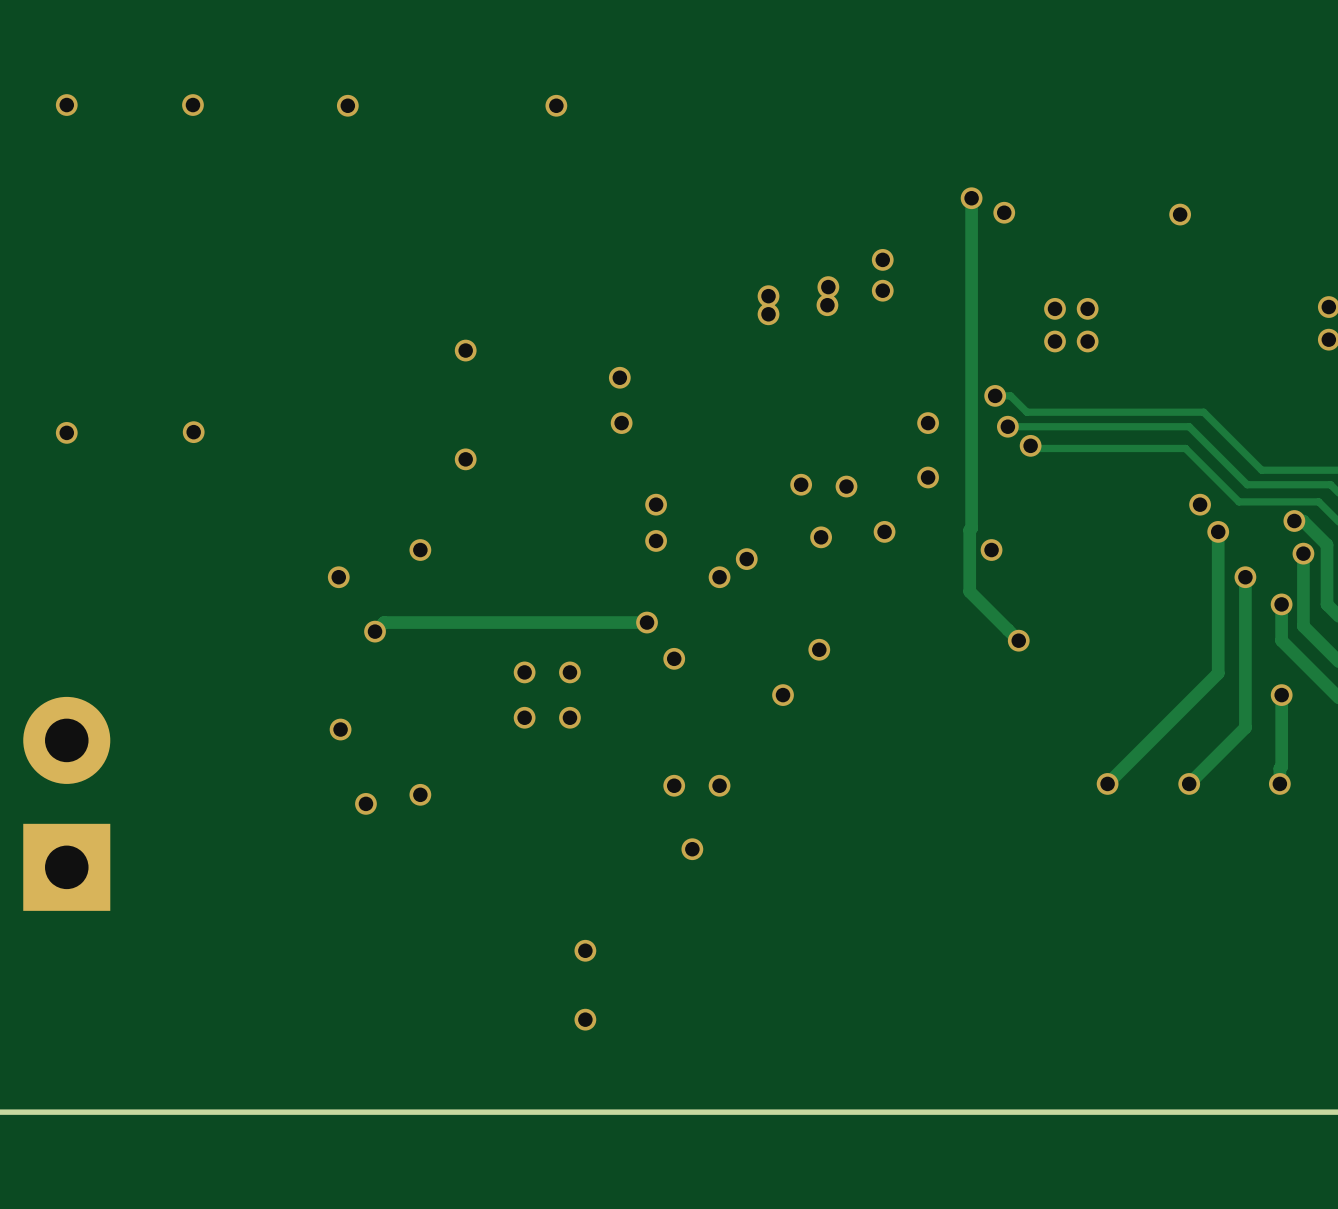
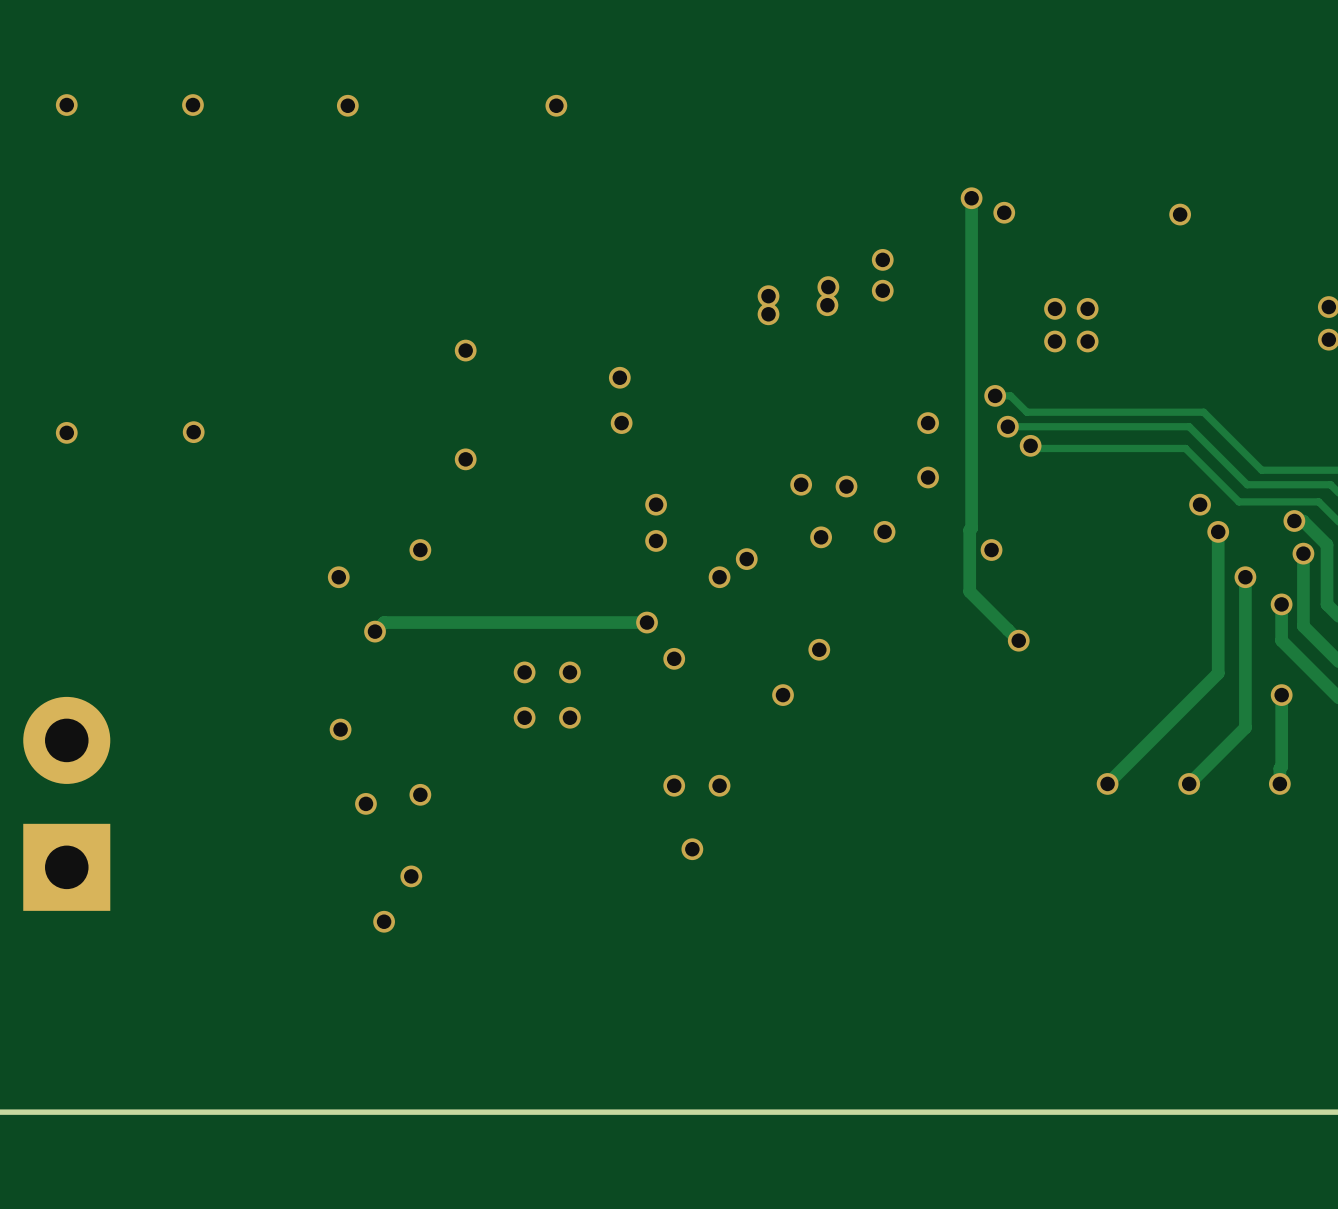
via: none -> (411, 876)
via: none -> (384, 921)
via: (585, 950) -> none
via: (585, 1019) -> none

